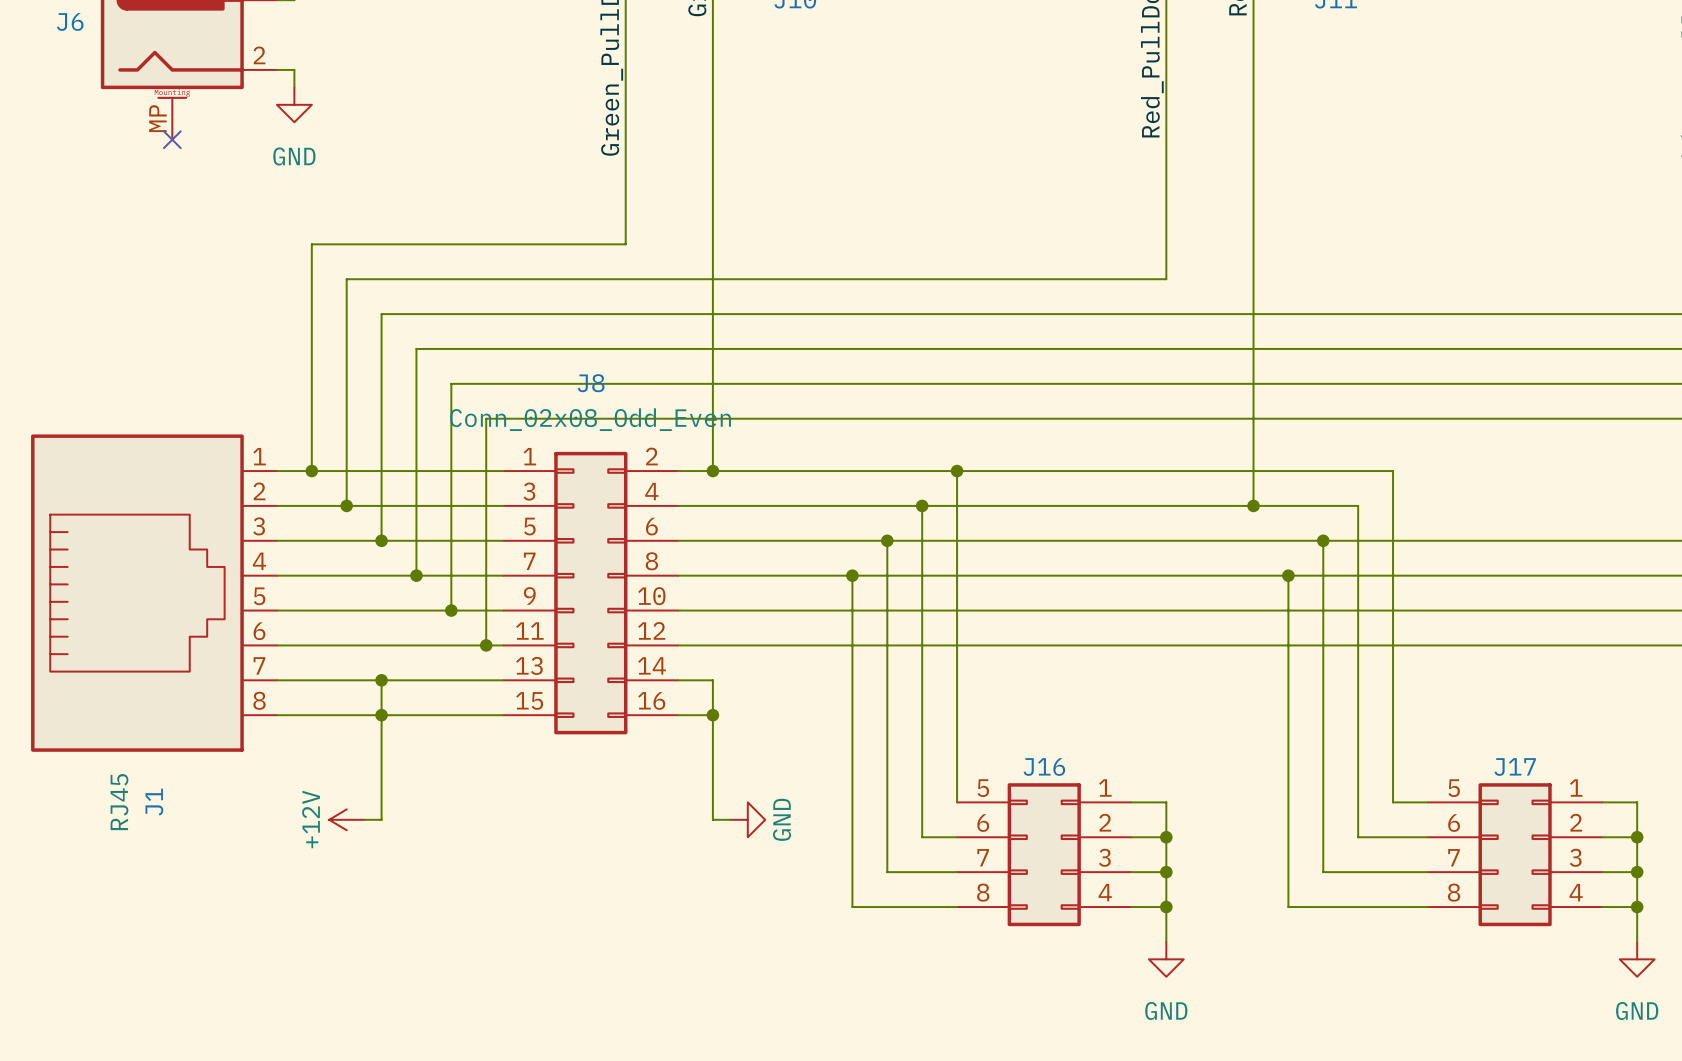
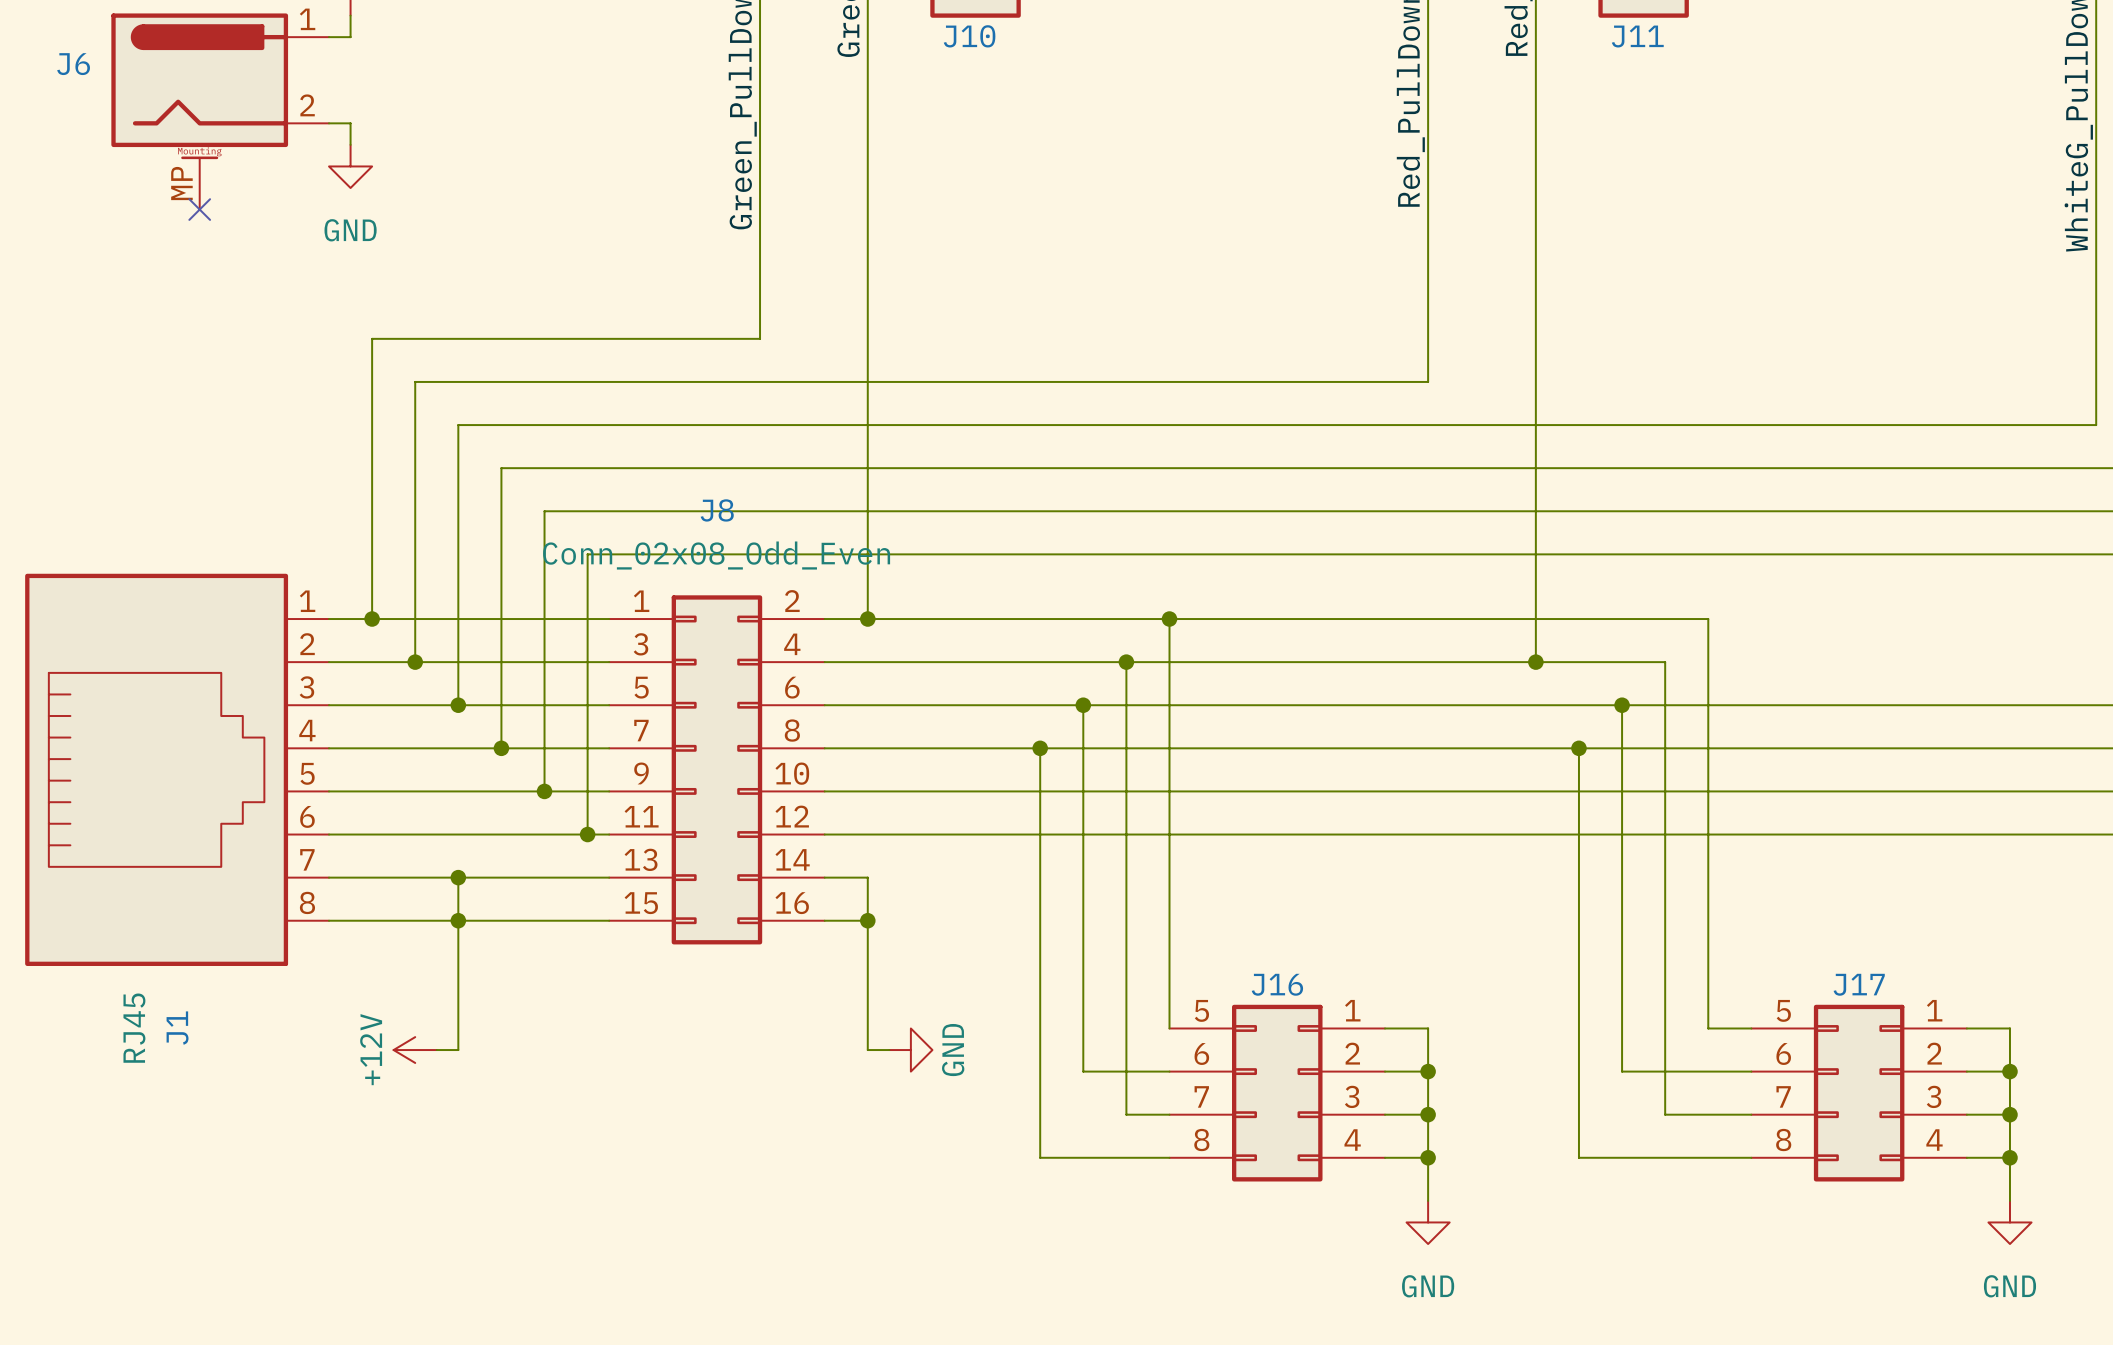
wire: (887, 837) (887, 872) (922, 872) -> (1083, 1071) (1126, 1071) (1126, 1114)
wire: (1323, 837) (1323, 872) (1358, 872) -> (1622, 1071) (1665, 1071) (1665, 1114)

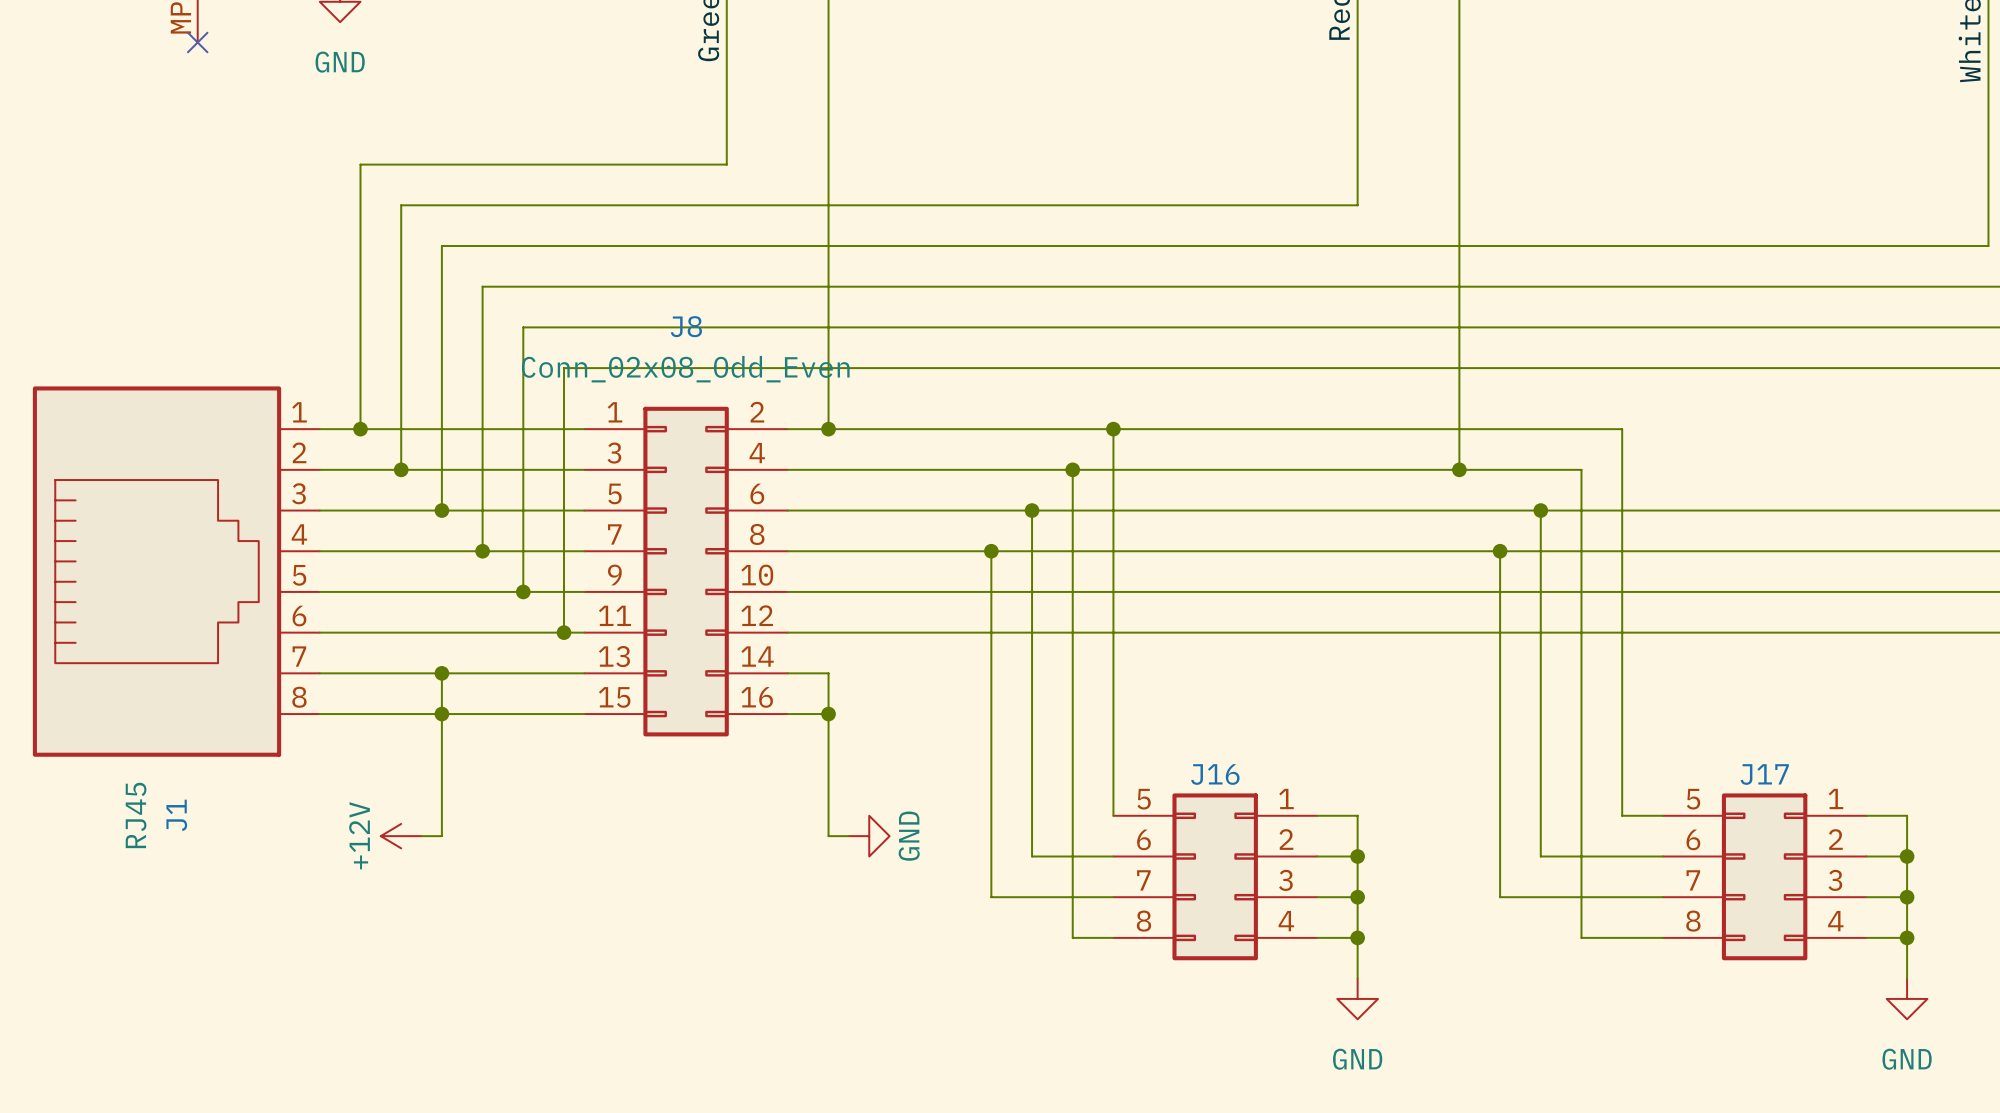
wire: (1040, 1114) (1040, 1157) (1126, 1157) -> (991, 897) (1072, 897) (1072, 937)
wire: (1578, 1114) (1578, 1157) (1665, 1157) -> (1500, 897) (1581, 897) (1581, 937)

